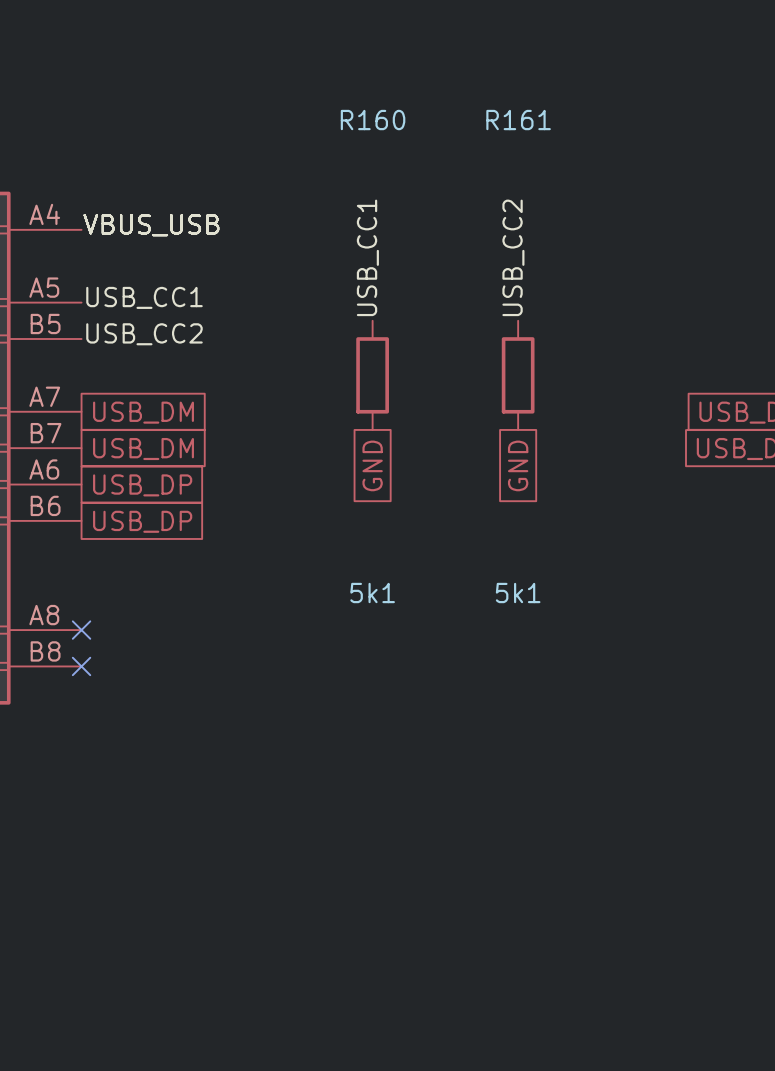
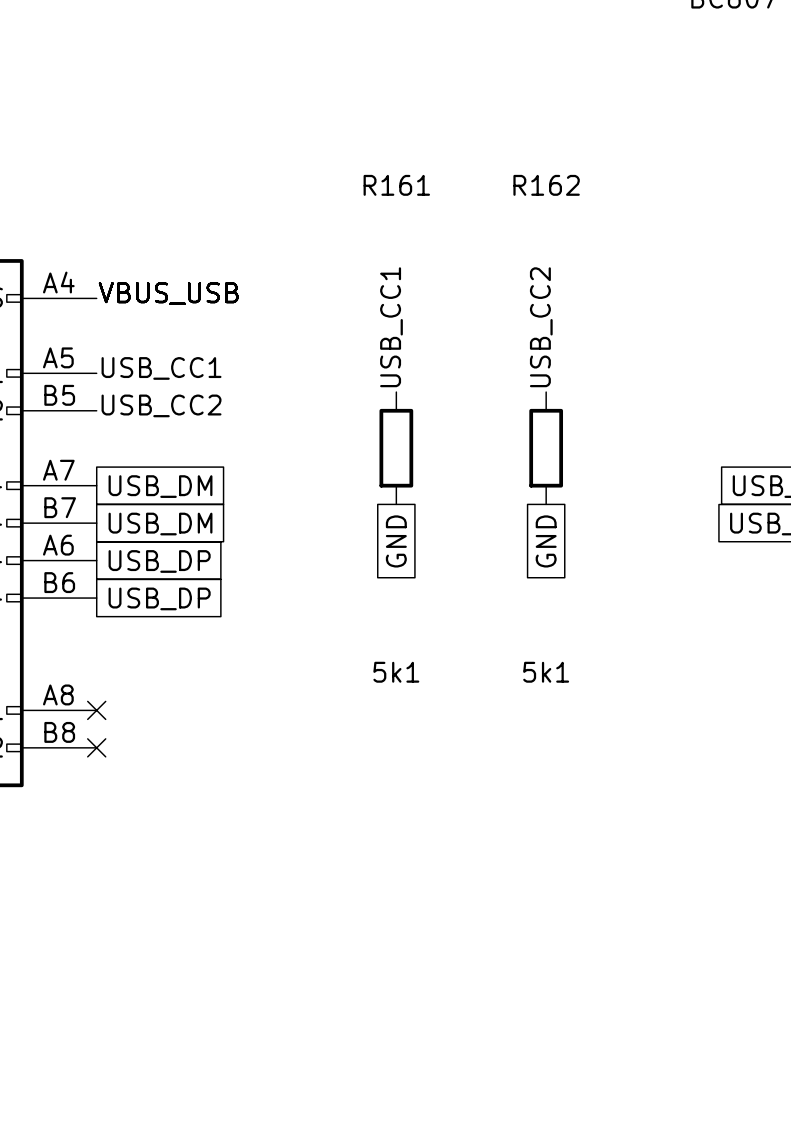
R160 name: R160 (373, 120) -> R161 (396, 185)
R161 name: R161 (518, 120) -> R162 (546, 185)

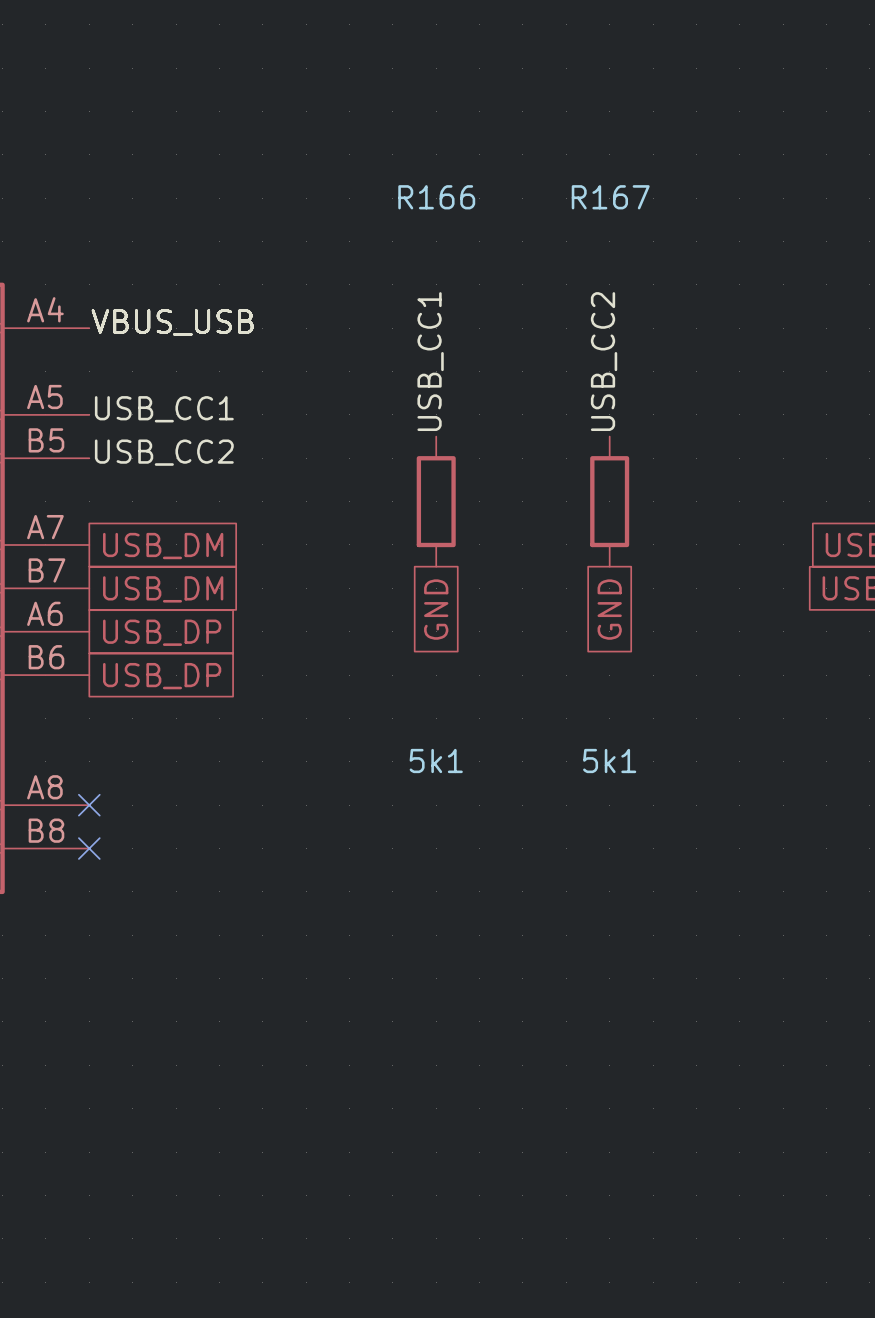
R161 name: R161 (396, 185) -> R166 (436, 197)
R162 name: R162 (546, 185) -> R167 (610, 197)

